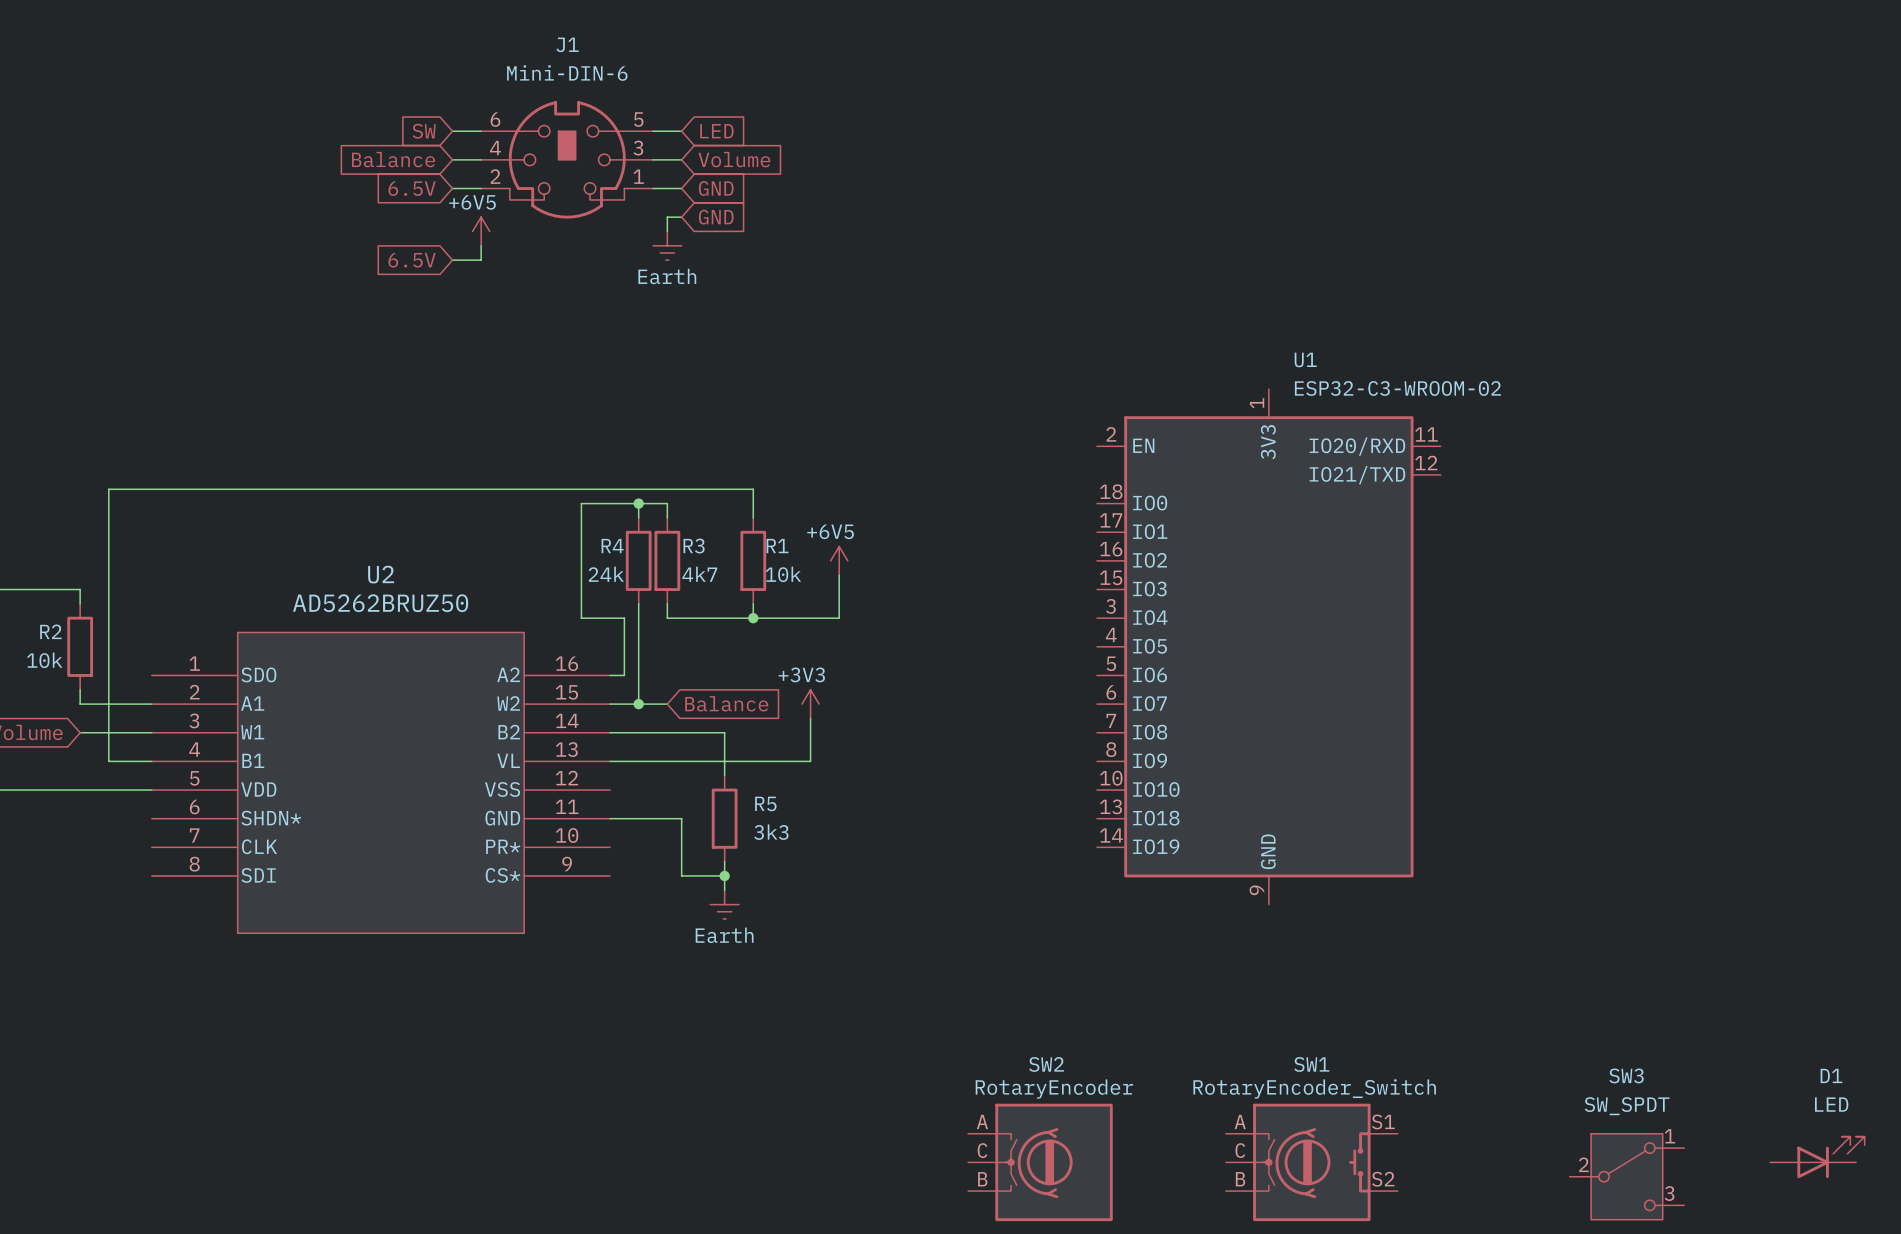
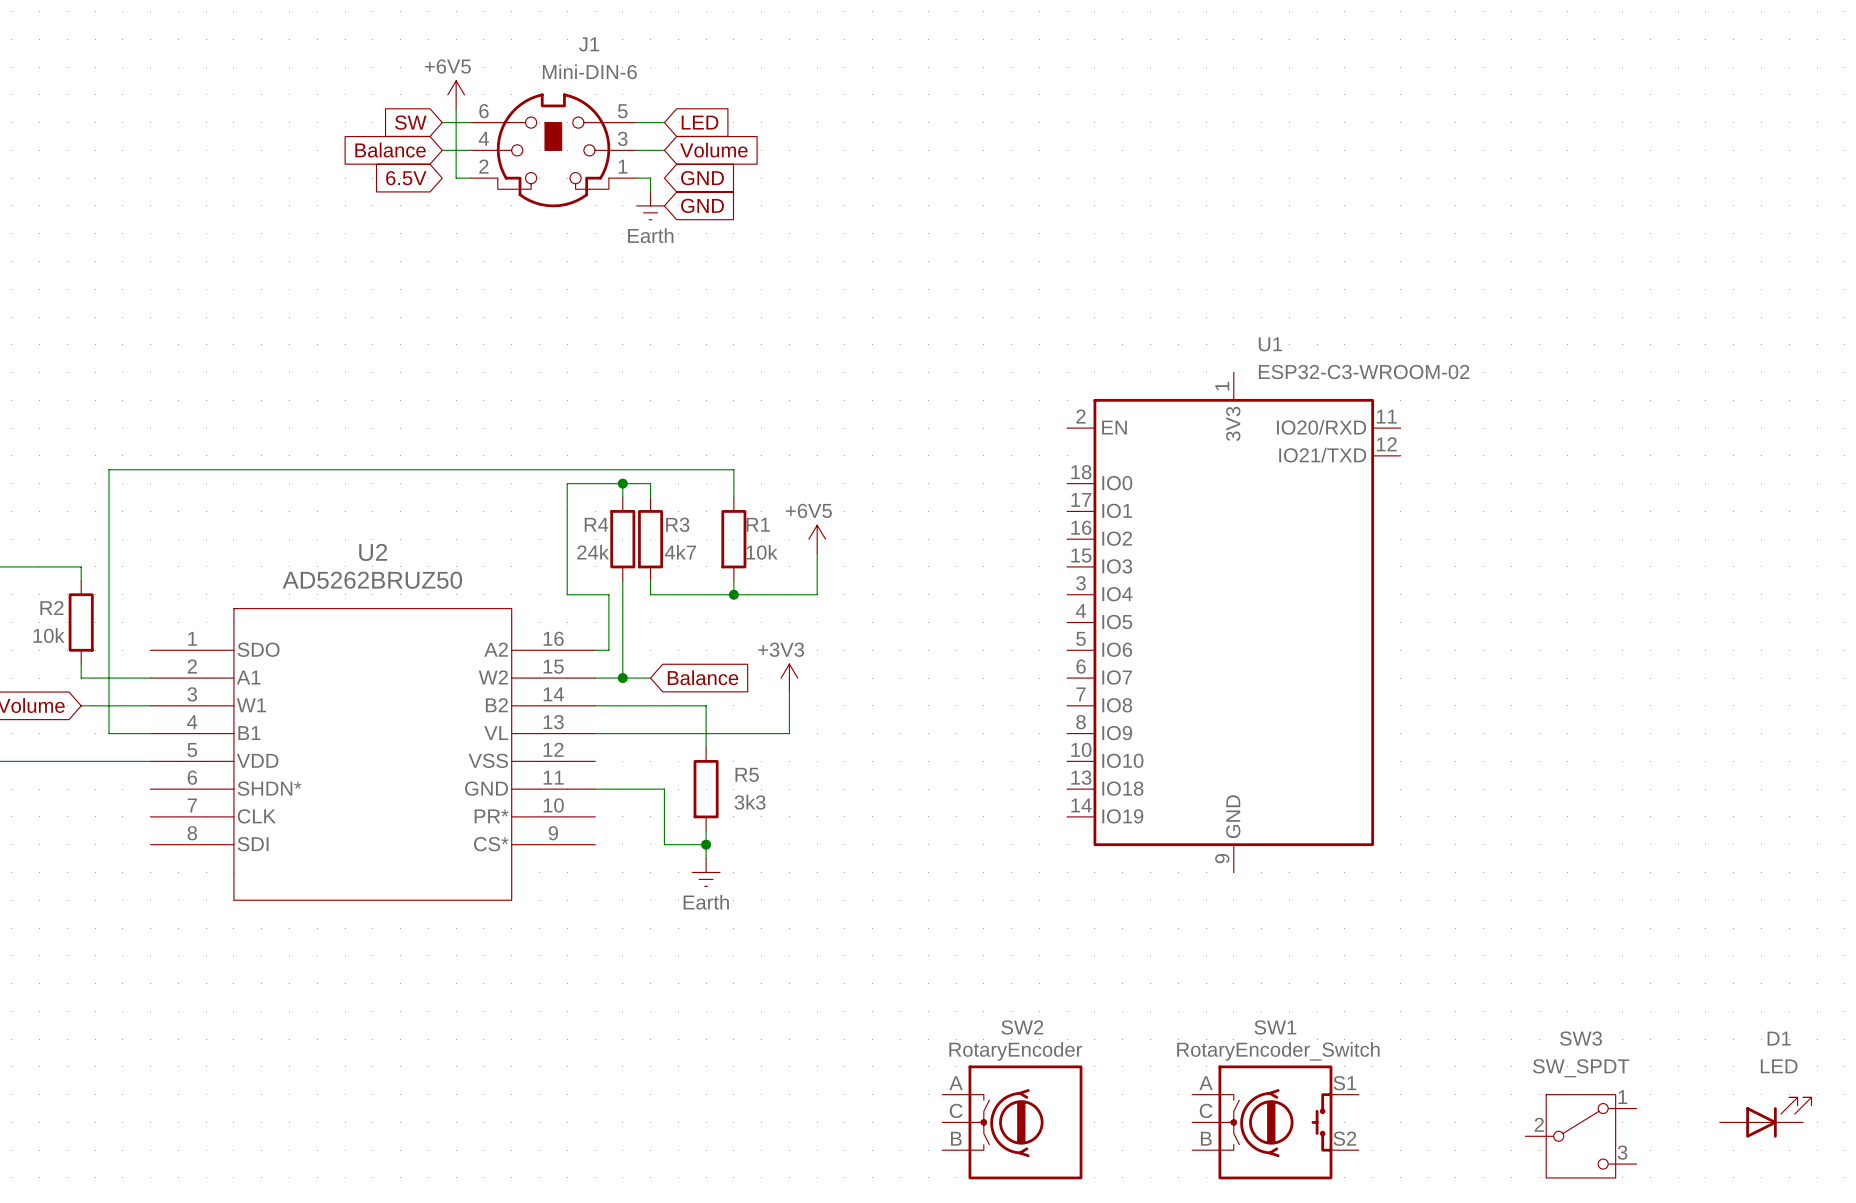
J1 name position: J1 (567, 44) -> J1 (589, 44)
J1 value position: Mini-DIN-6 (567, 73) -> Mini-DIN-6 (589, 71)
wire: (452, 188) (466, 188) -> (456, 108) (456, 178)
wire: (667, 188) (681, 188) -> (650, 178) (650, 192)
power symbol position: +6V5 (481, 231) -> +6V5 (456, 94)
wire: (481, 245) (481, 260) (452, 260) -> none
power symbol position: Earth (667, 245) -> Earth (650, 205)
global label: 6.5V (412, 260) -> none

